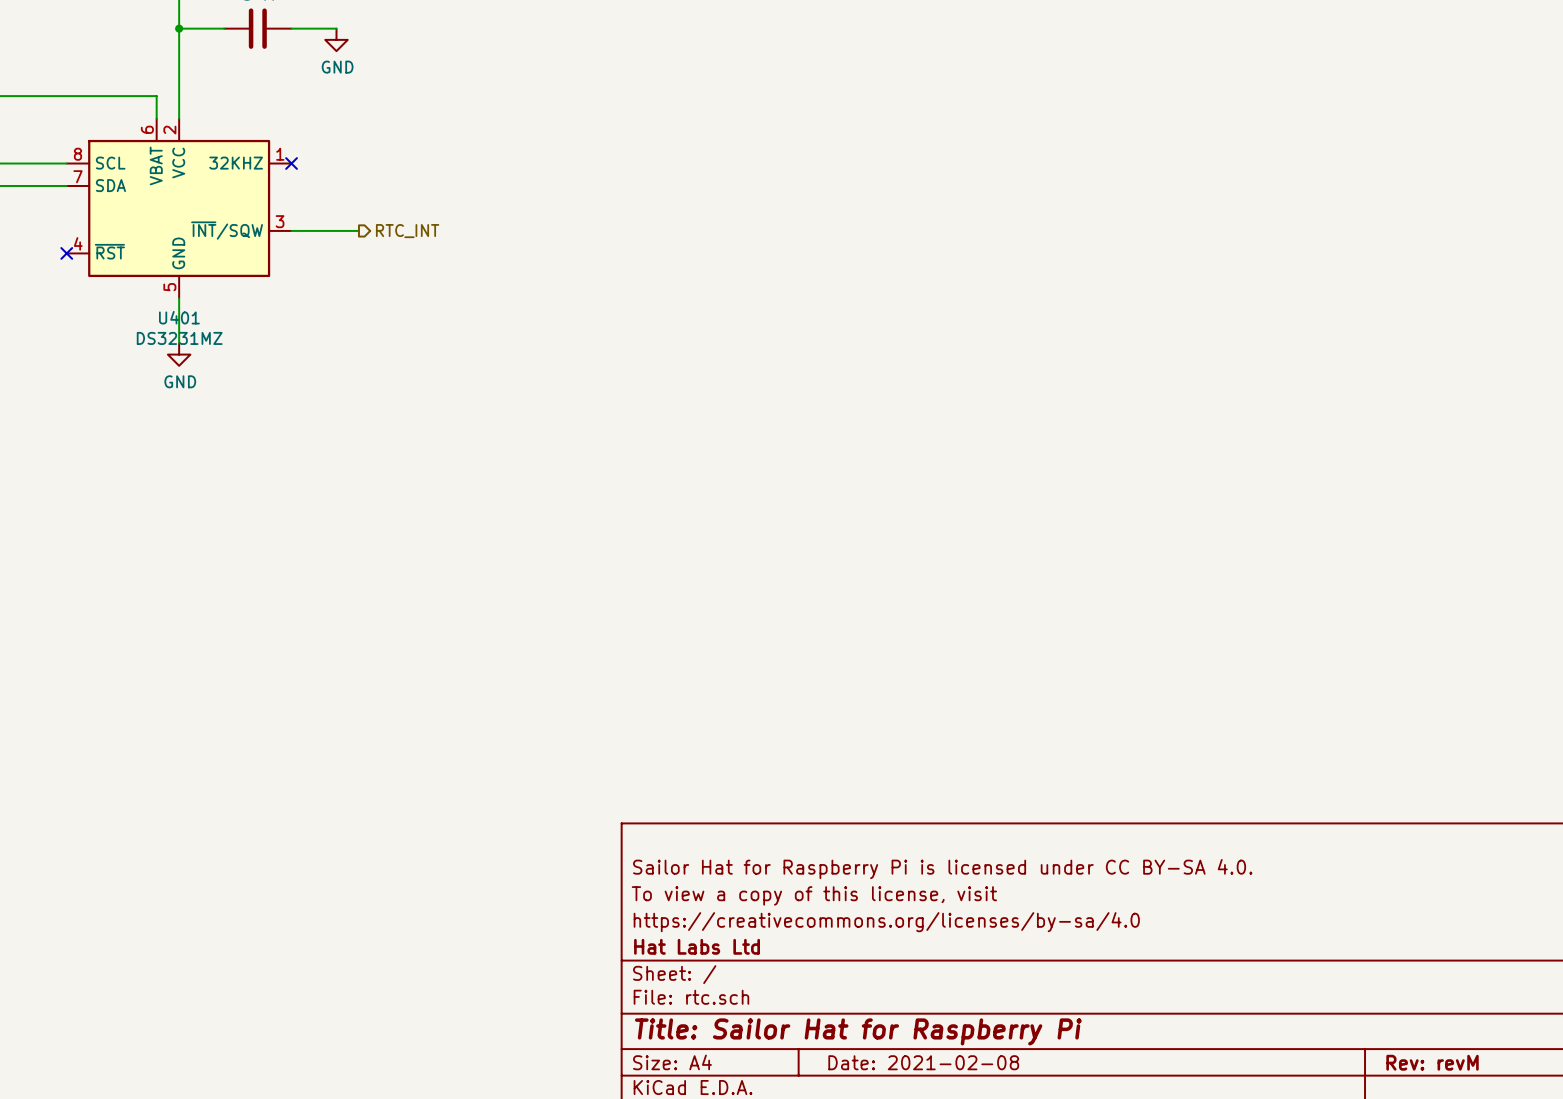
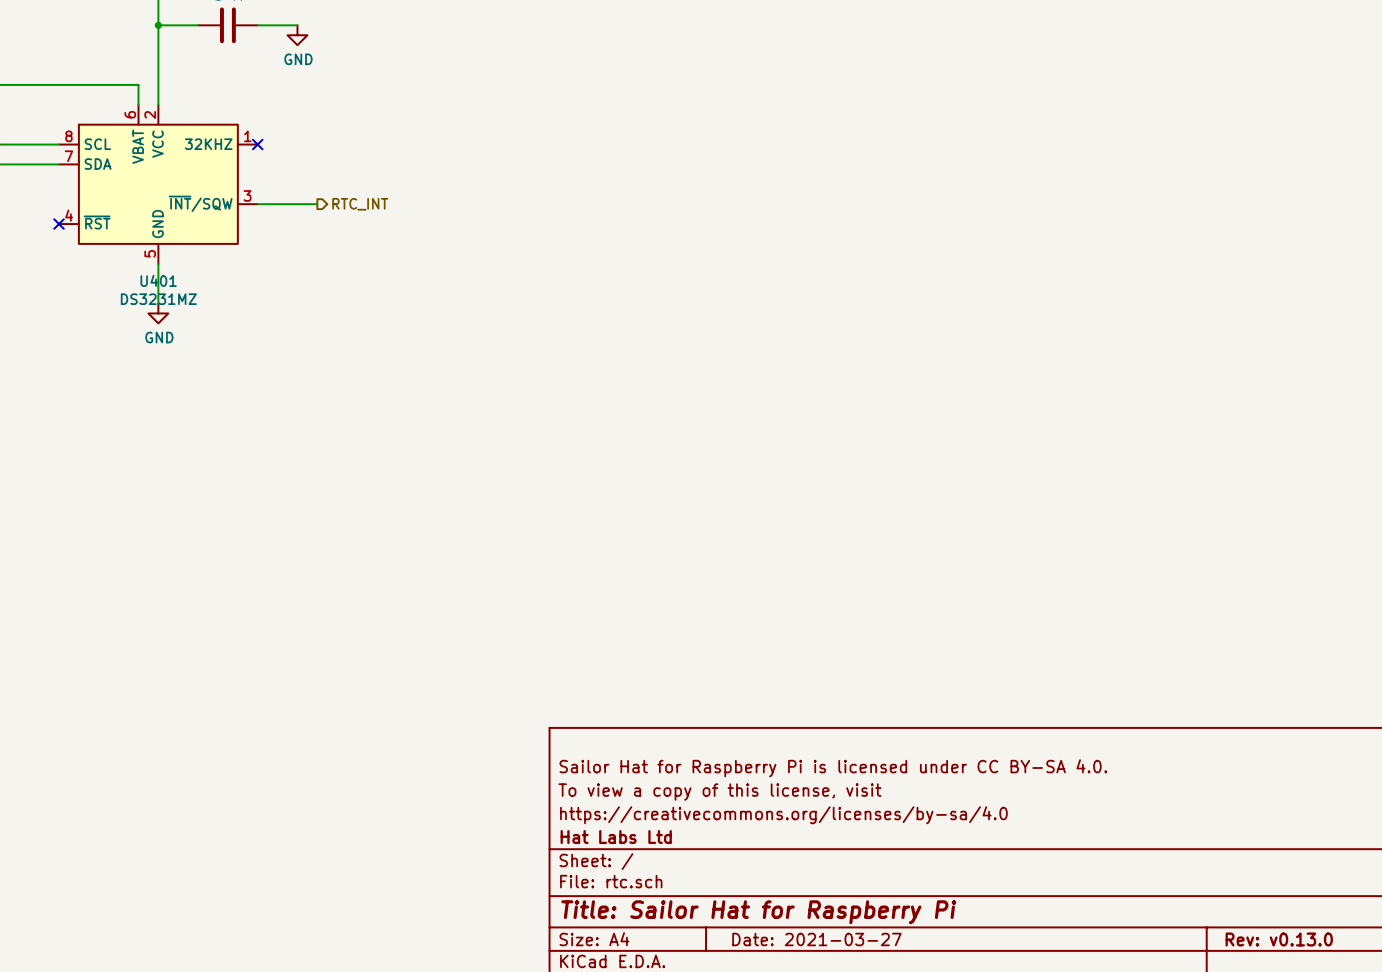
title block: Date: 2021-02-08 (923, 1062) -> Date: 2021-03-27 (816, 939)
title block: Rev: revM (1432, 1062) -> Rev: v0.13.0 (1279, 939)

